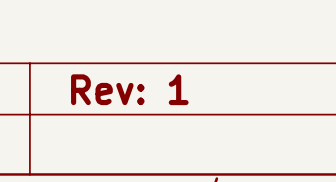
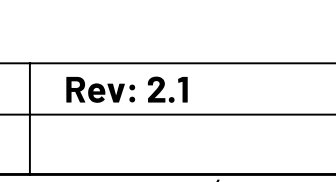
title block: Rev: 1 (129, 89) -> Rev: 2.1 (127, 89)

